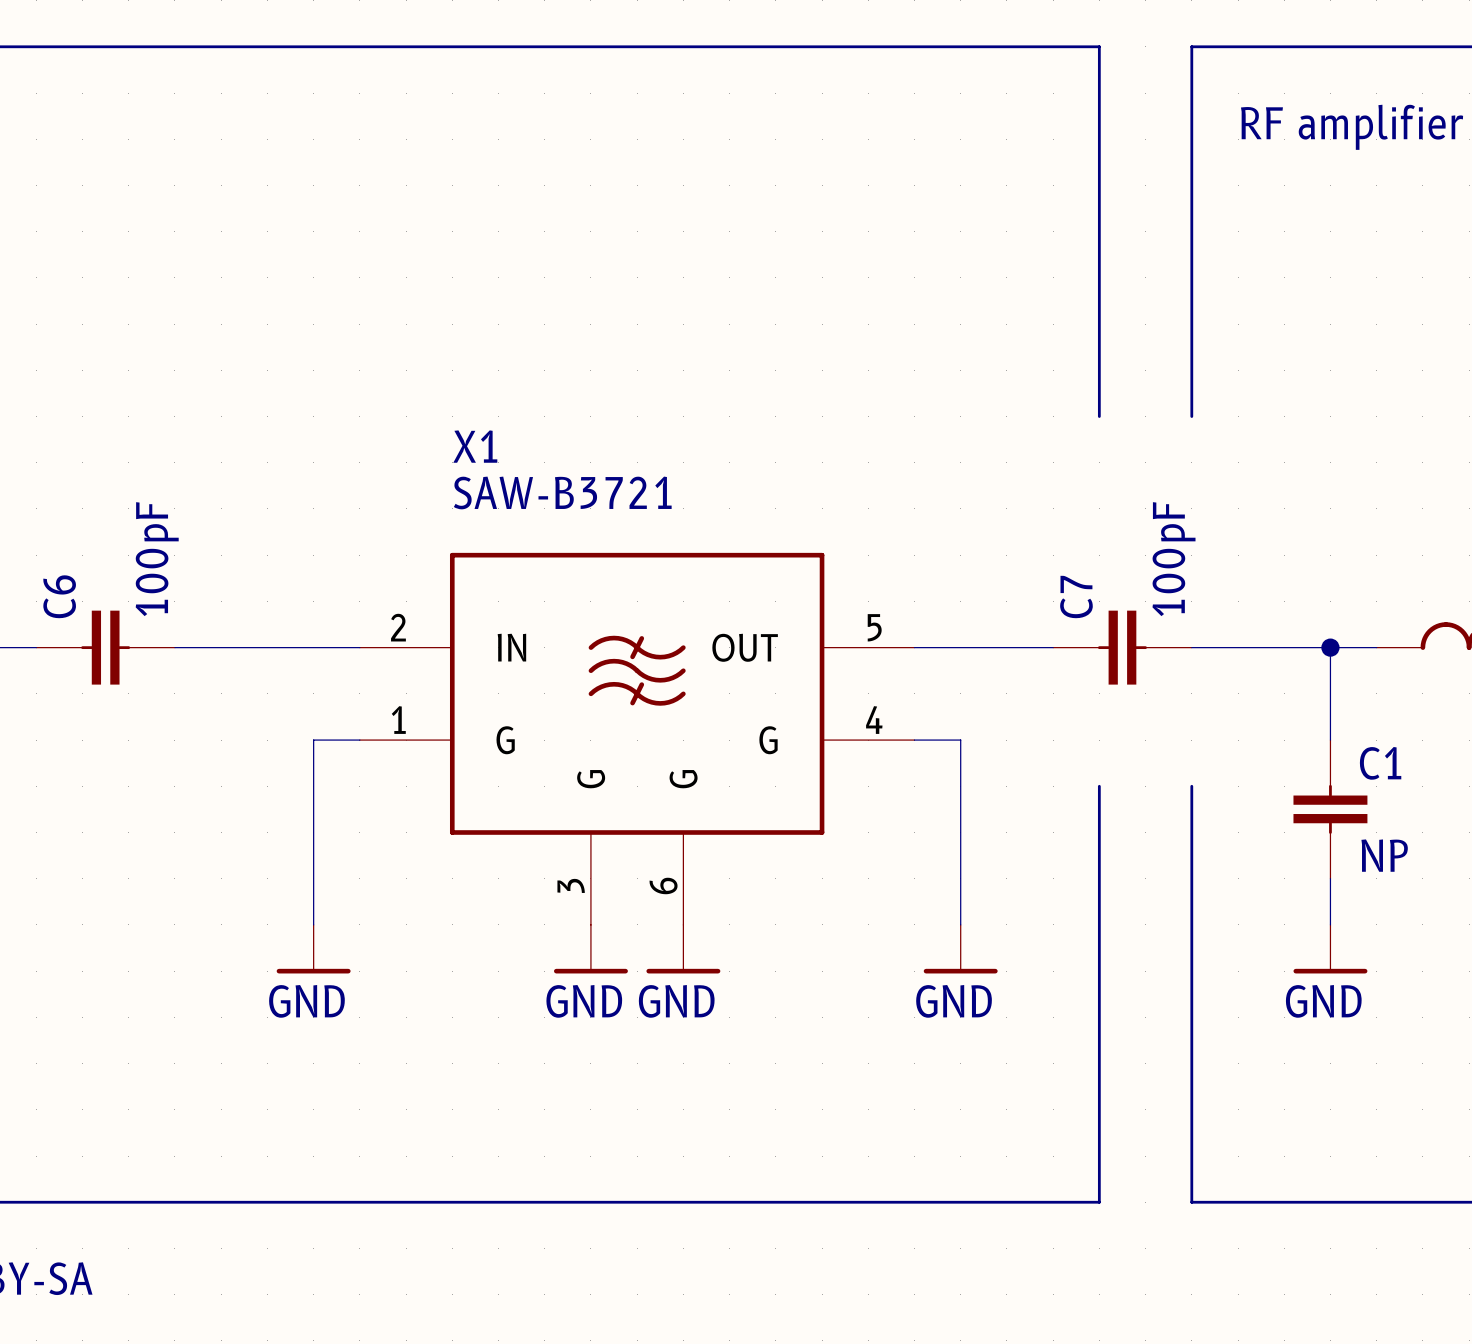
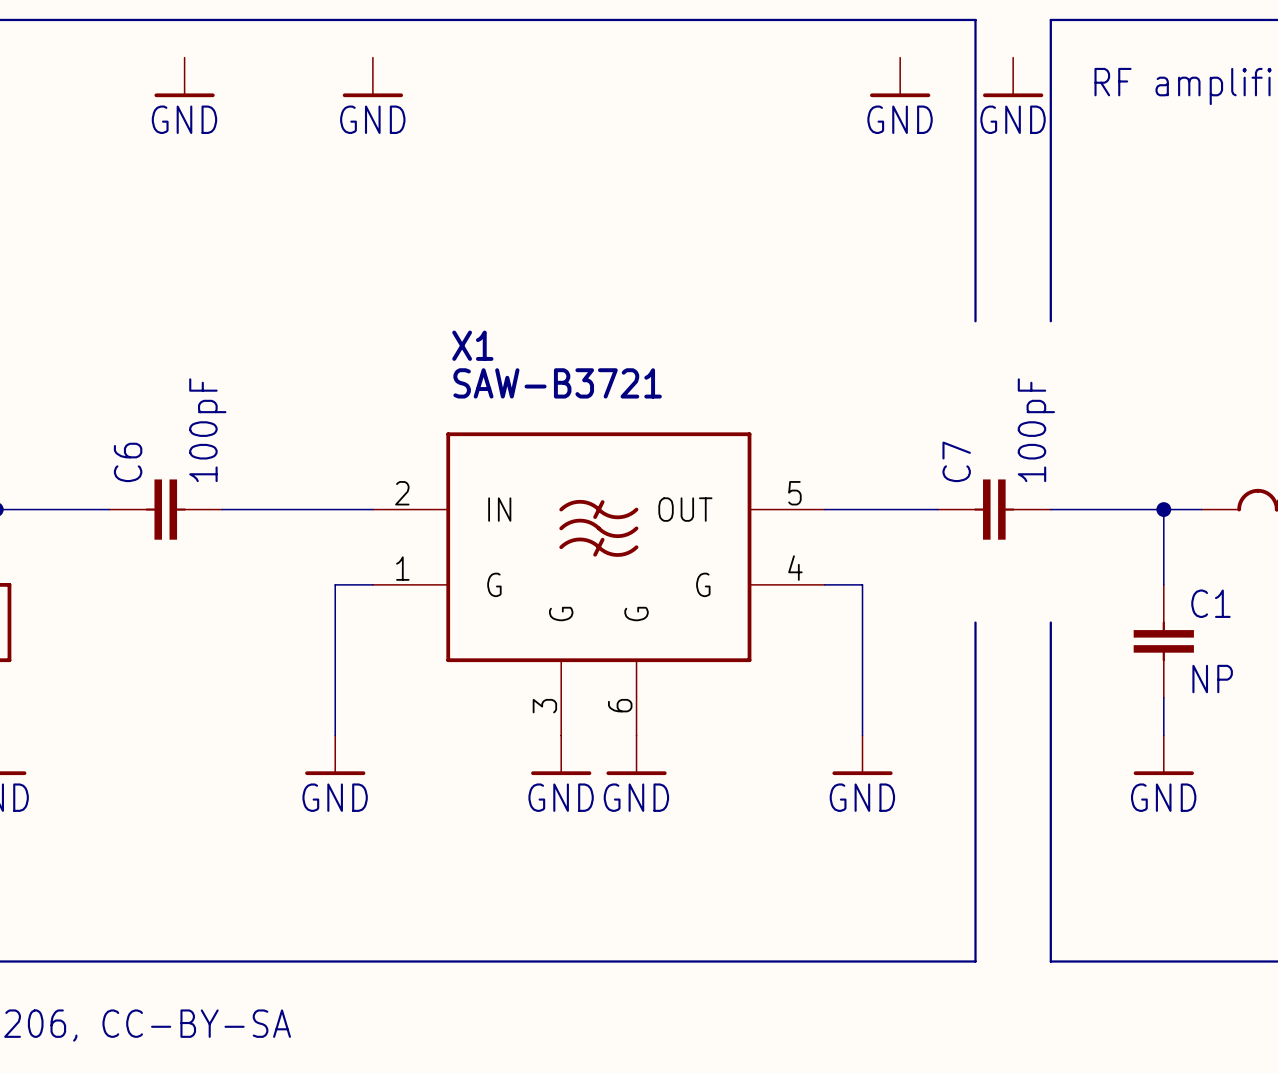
power symbol: none -> GND (184, 77)
power symbol: none -> GND (372, 77)
power symbol: none -> GND (900, 77)
power symbol: none -> GND (1013, 77)

